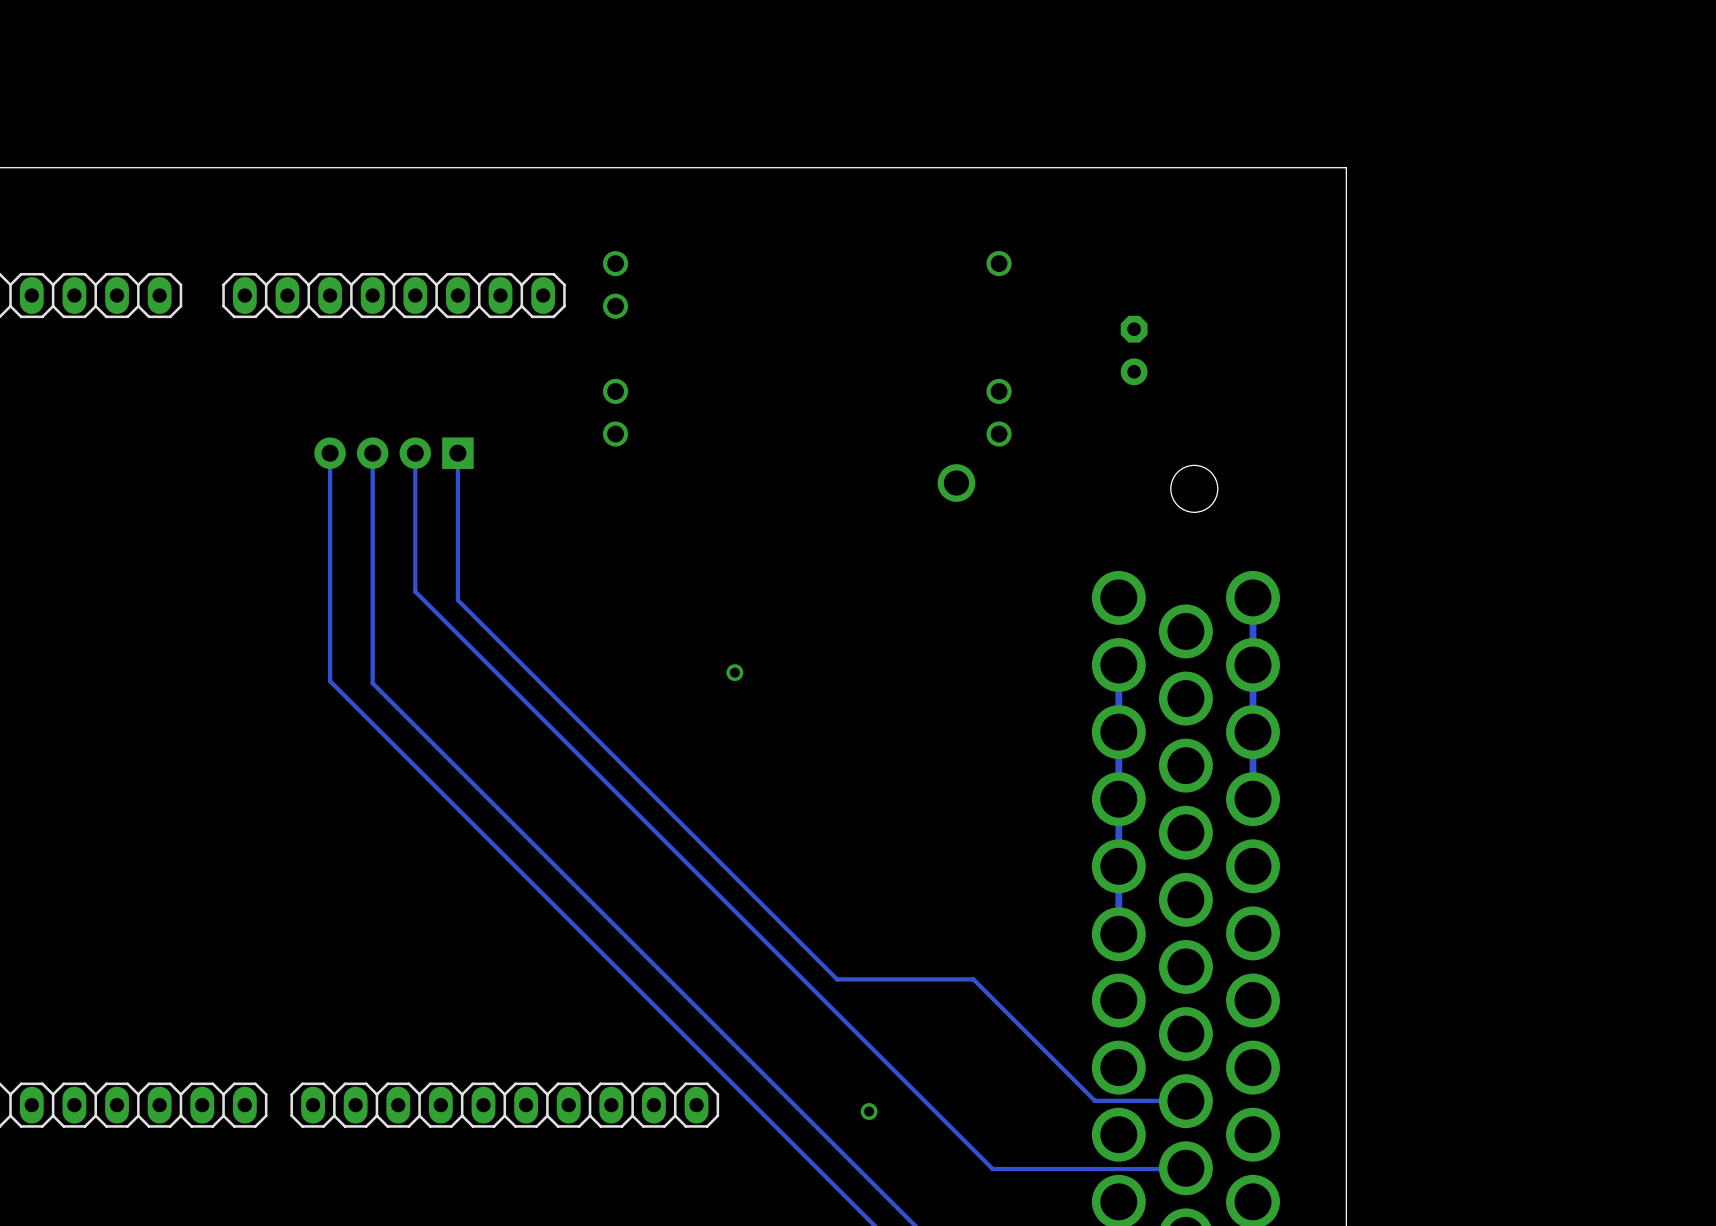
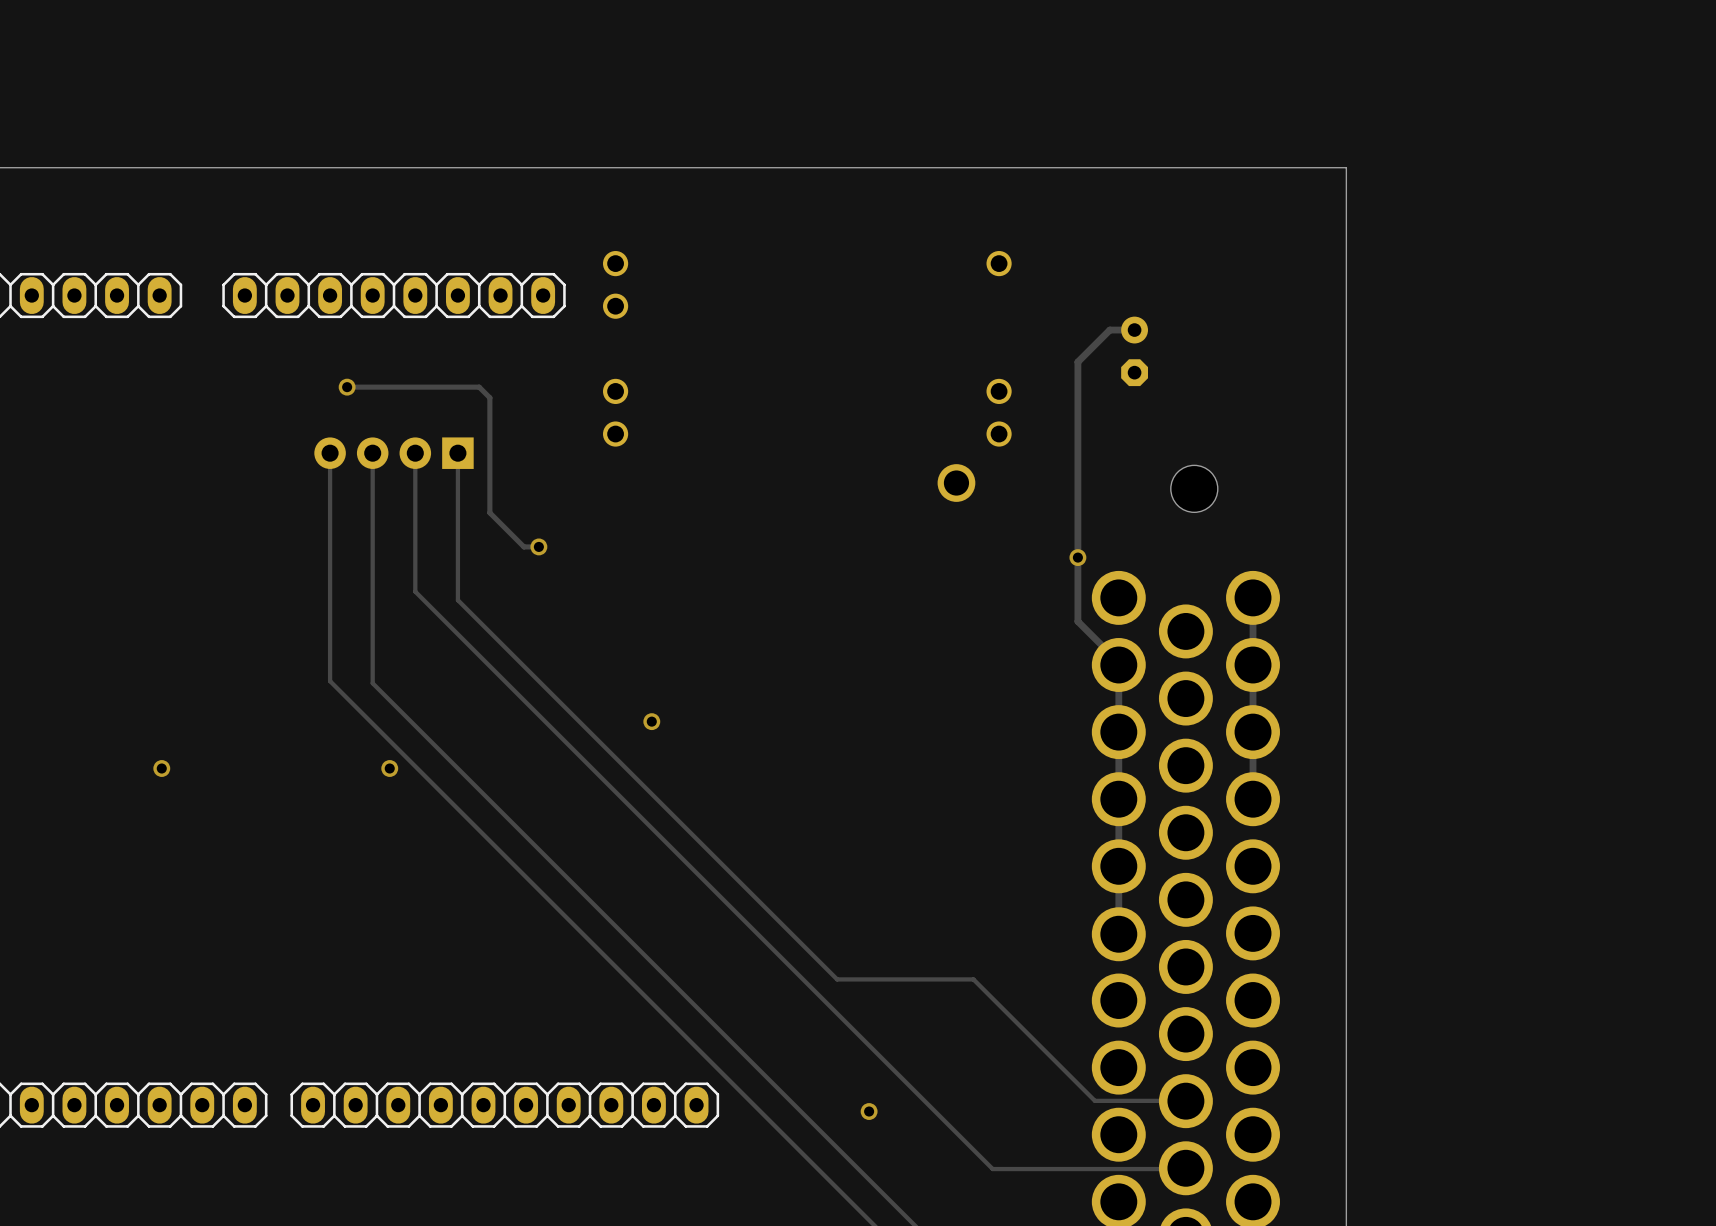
track: none -> (1134, 330) (1109, 330) (1077, 362) (1077, 621) (1118, 662) (1118, 665)
part rotation: 0° (1134, 350) -> 180° (1134, 351)
track: none -> (347, 387) (479, 387) (489, 397) (489, 512) (523, 546) (538, 546)
via: none -> (347, 387)
via: none -> (538, 546)
via: none -> (1077, 557)
via position: (734, 672) -> (651, 721)
via: none -> (161, 768)
via: none -> (389, 768)

